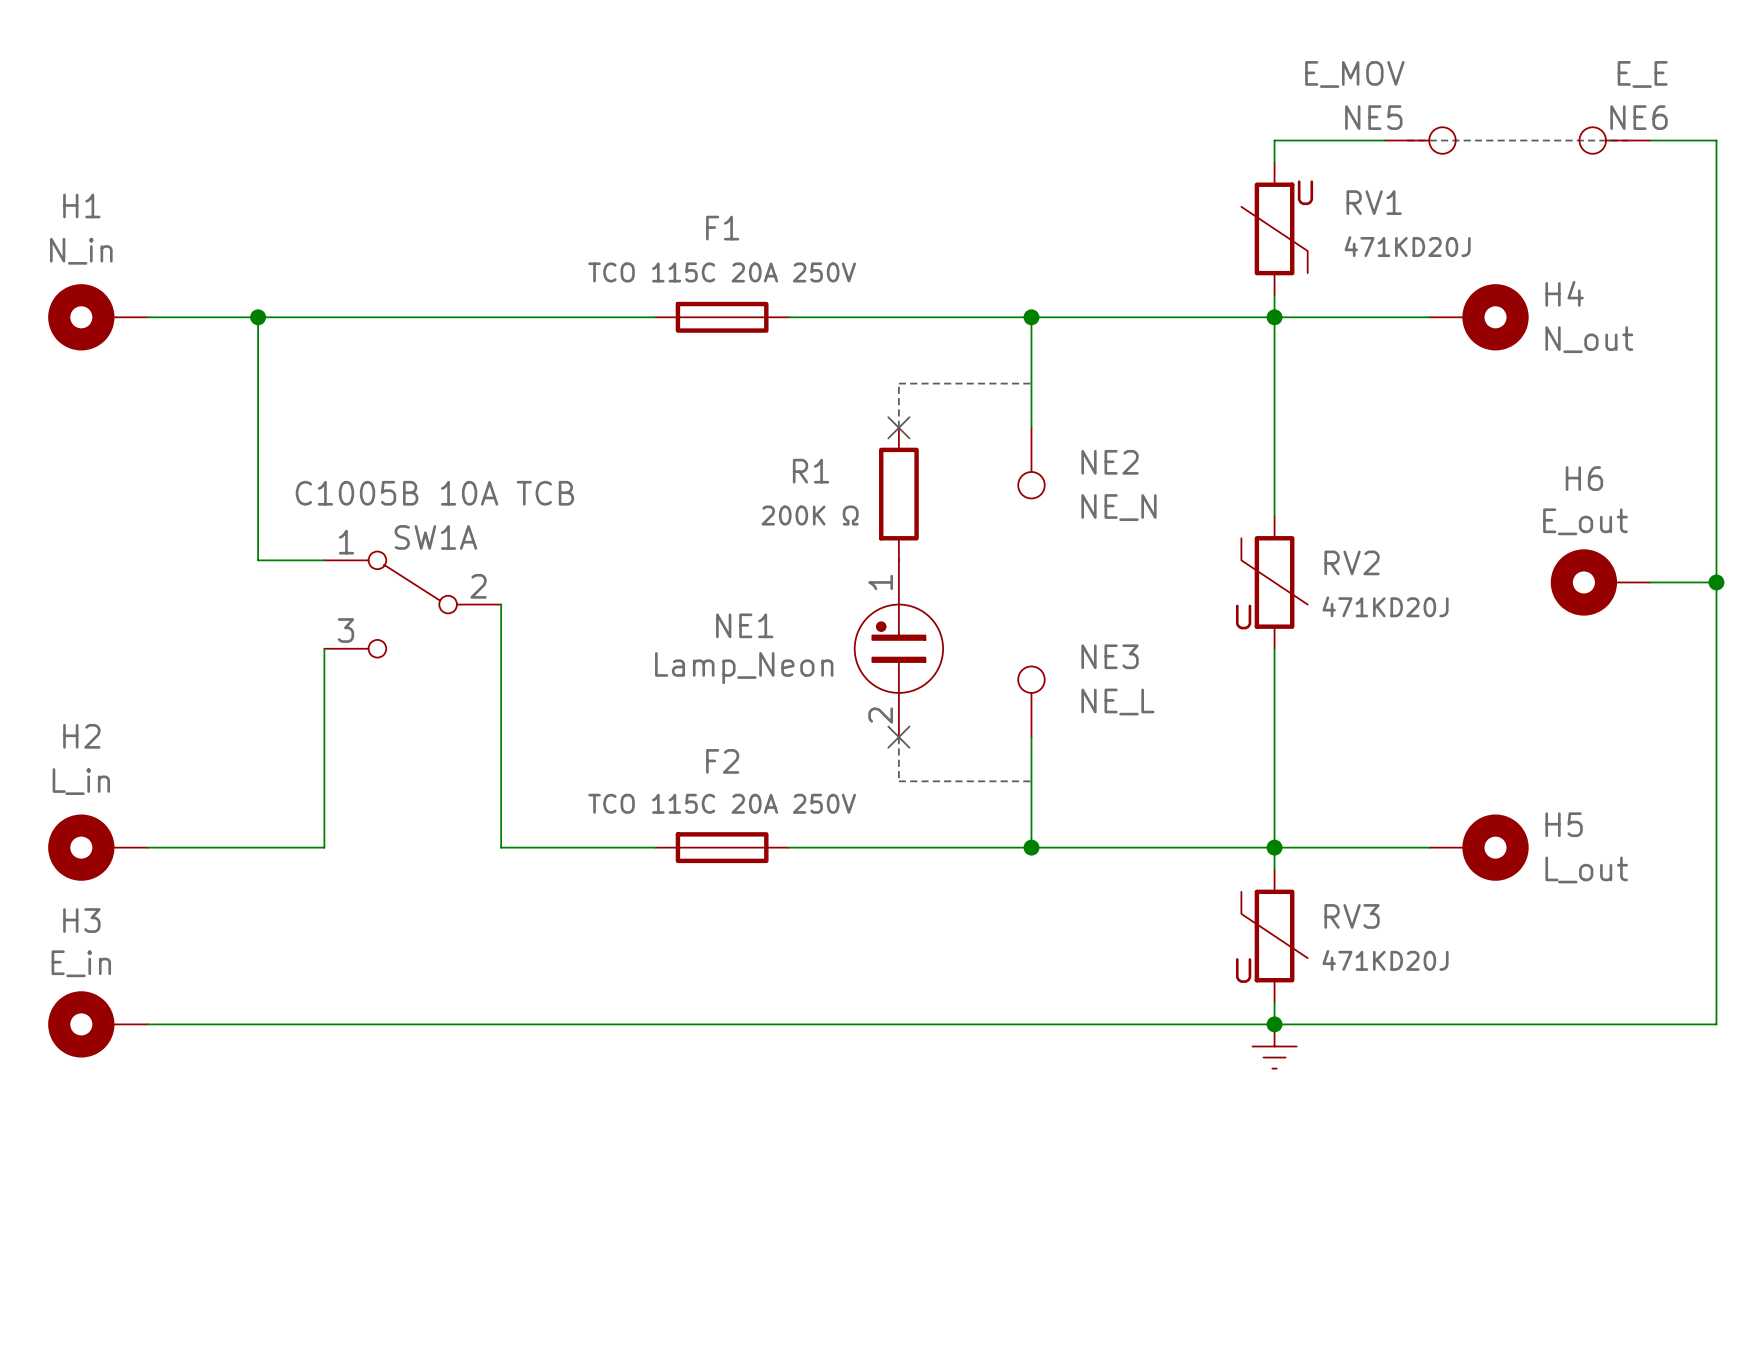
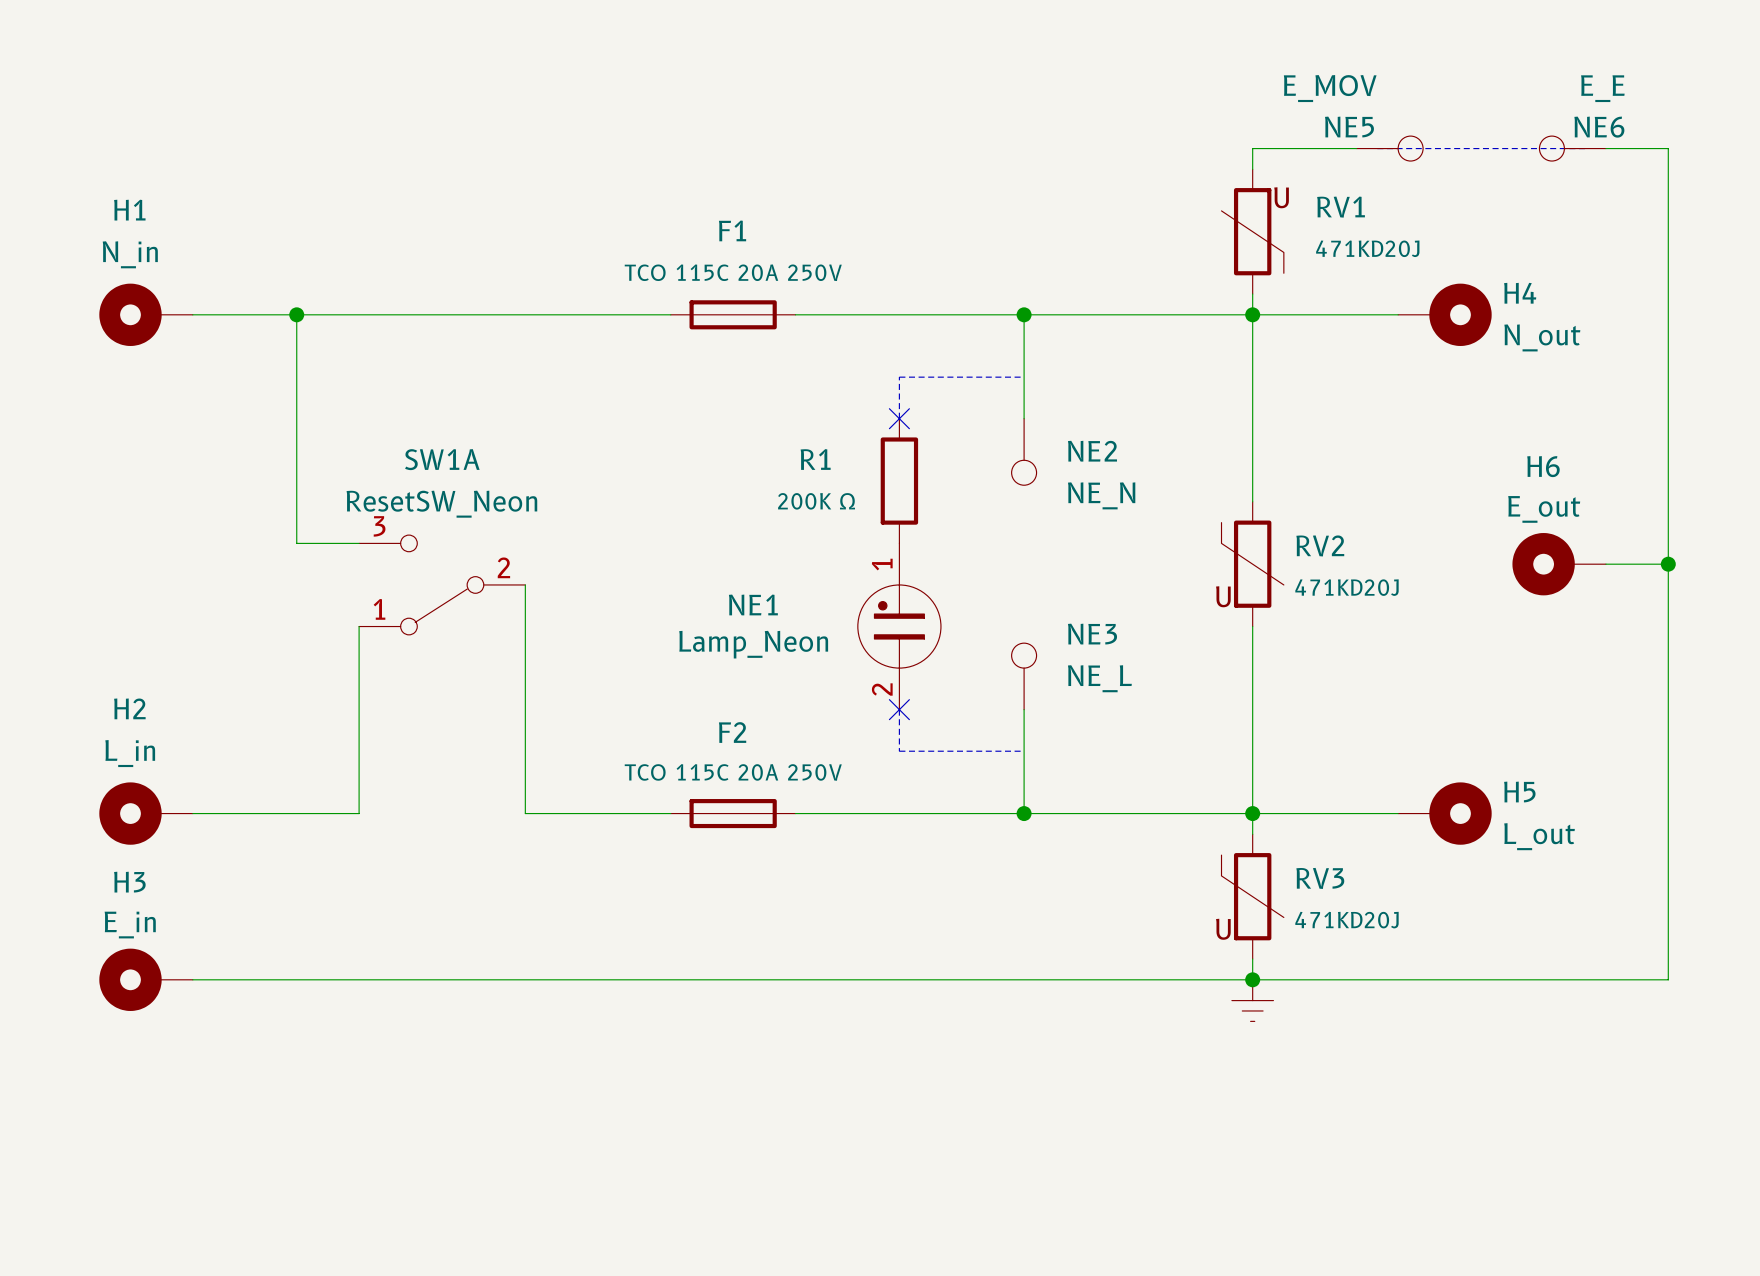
SW1A value: C1005B 10A TCB (434, 493) -> ResetSW_Neon (441, 504)
SW1A name position: SW1A (435, 537) -> SW1A (442, 459)
SW1A flip: as is (412, 604) -> up-down (442, 584)

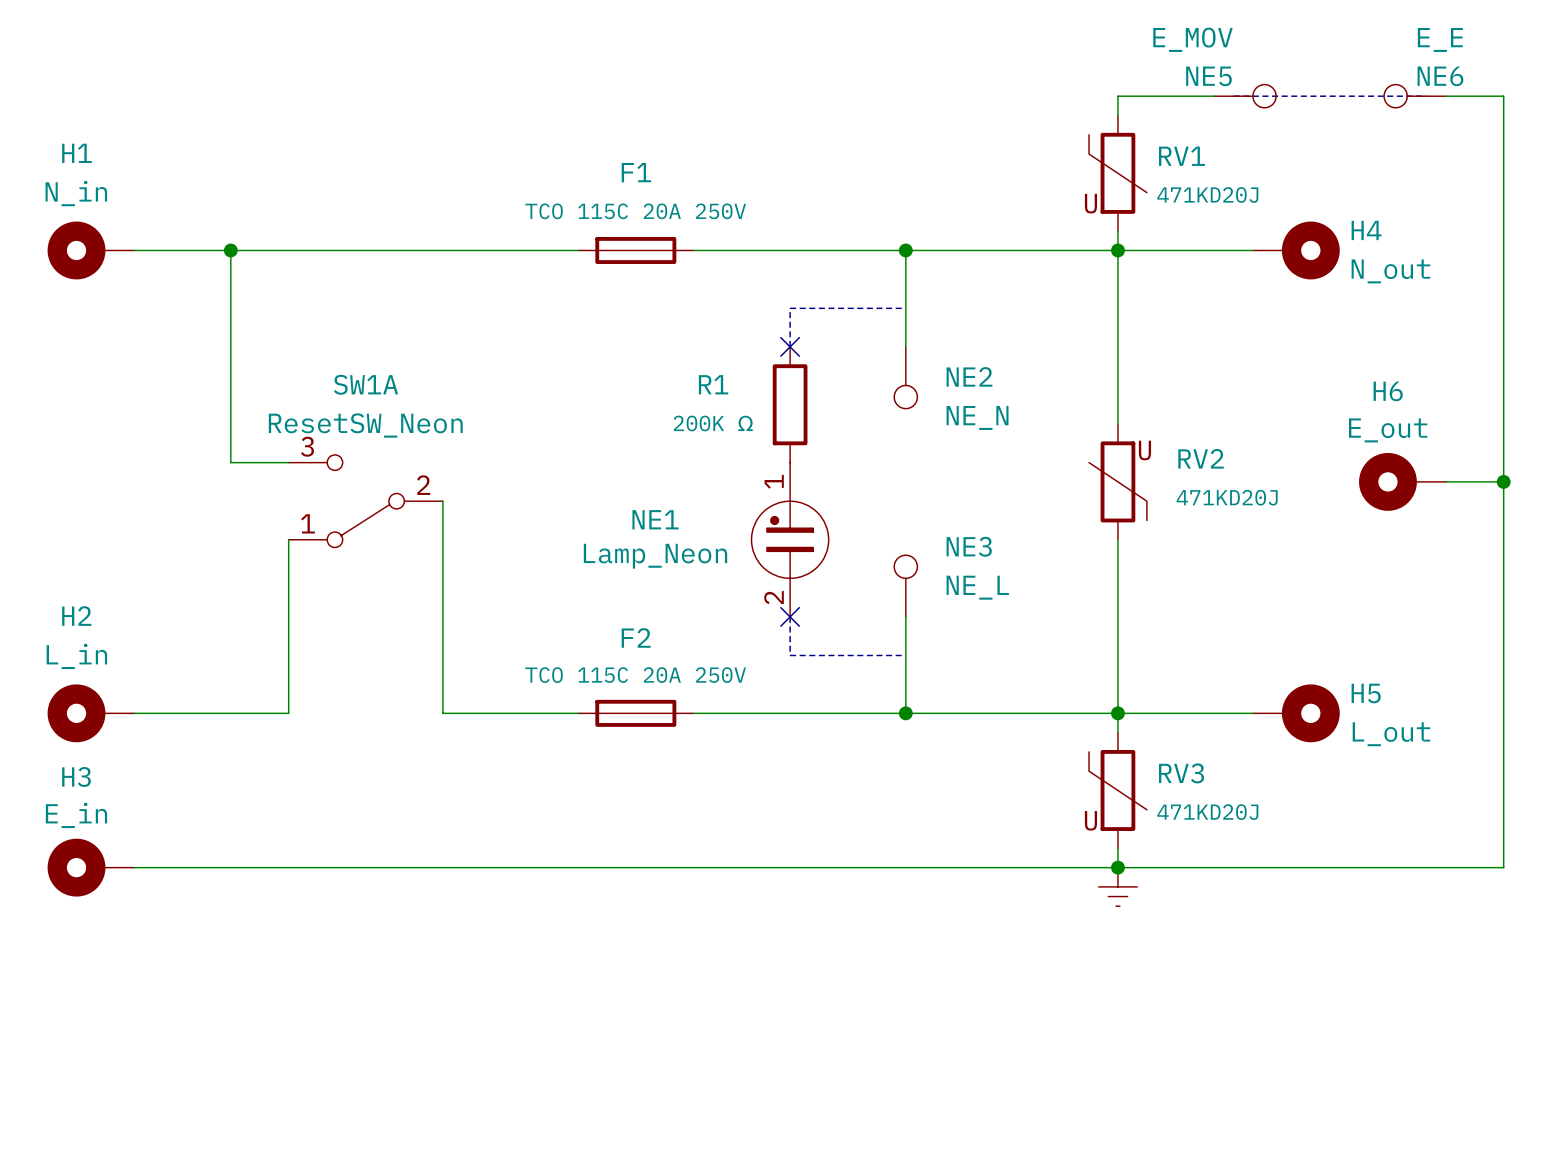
RV1 rotation: 0° (1252, 231) -> 180° (1117, 173)
RV2 rotation: 0° (1252, 564) -> 180° (1117, 481)

